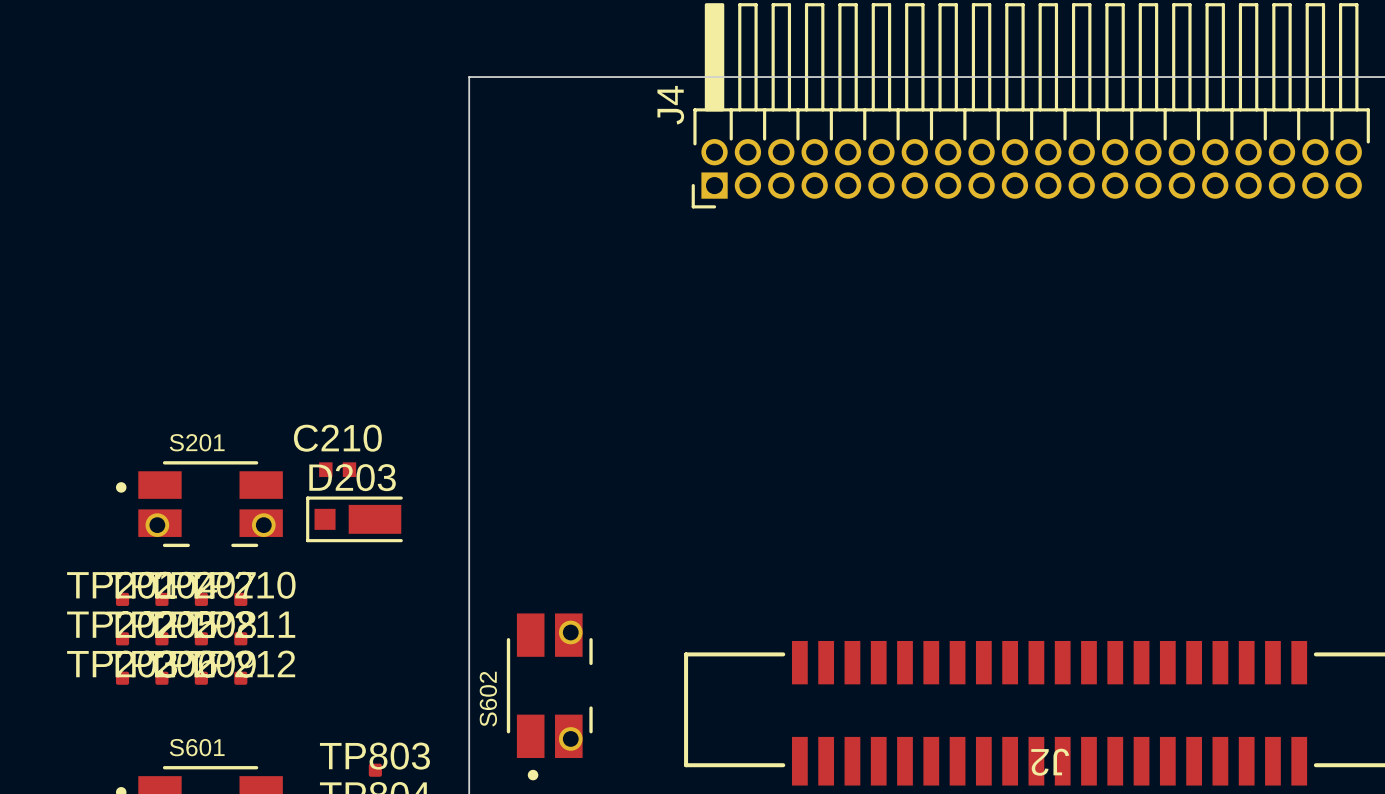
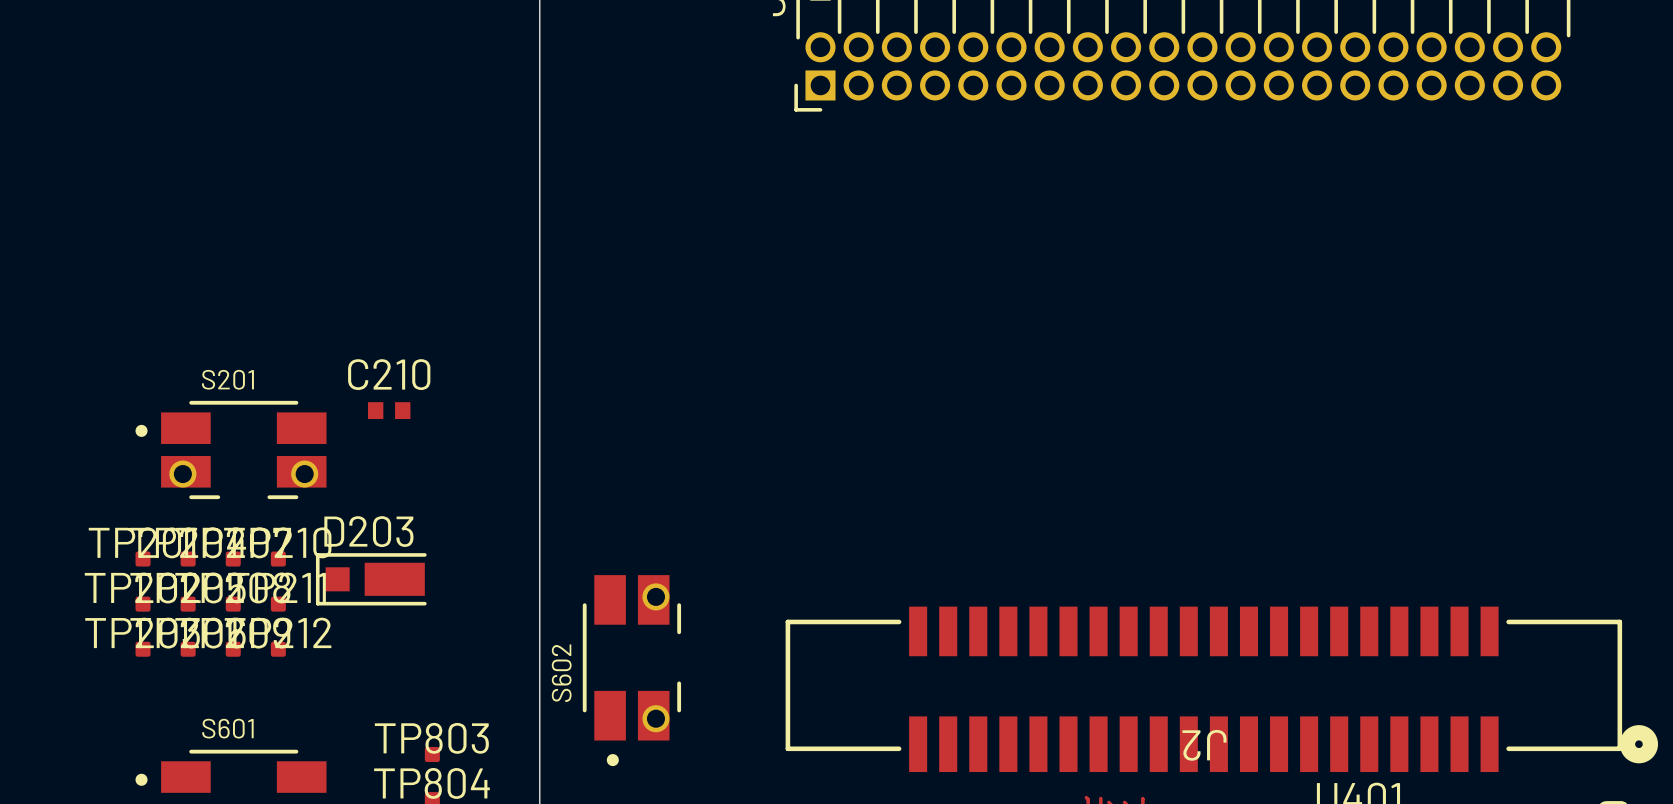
D203 position: (354, 519) -> (371, 579)

